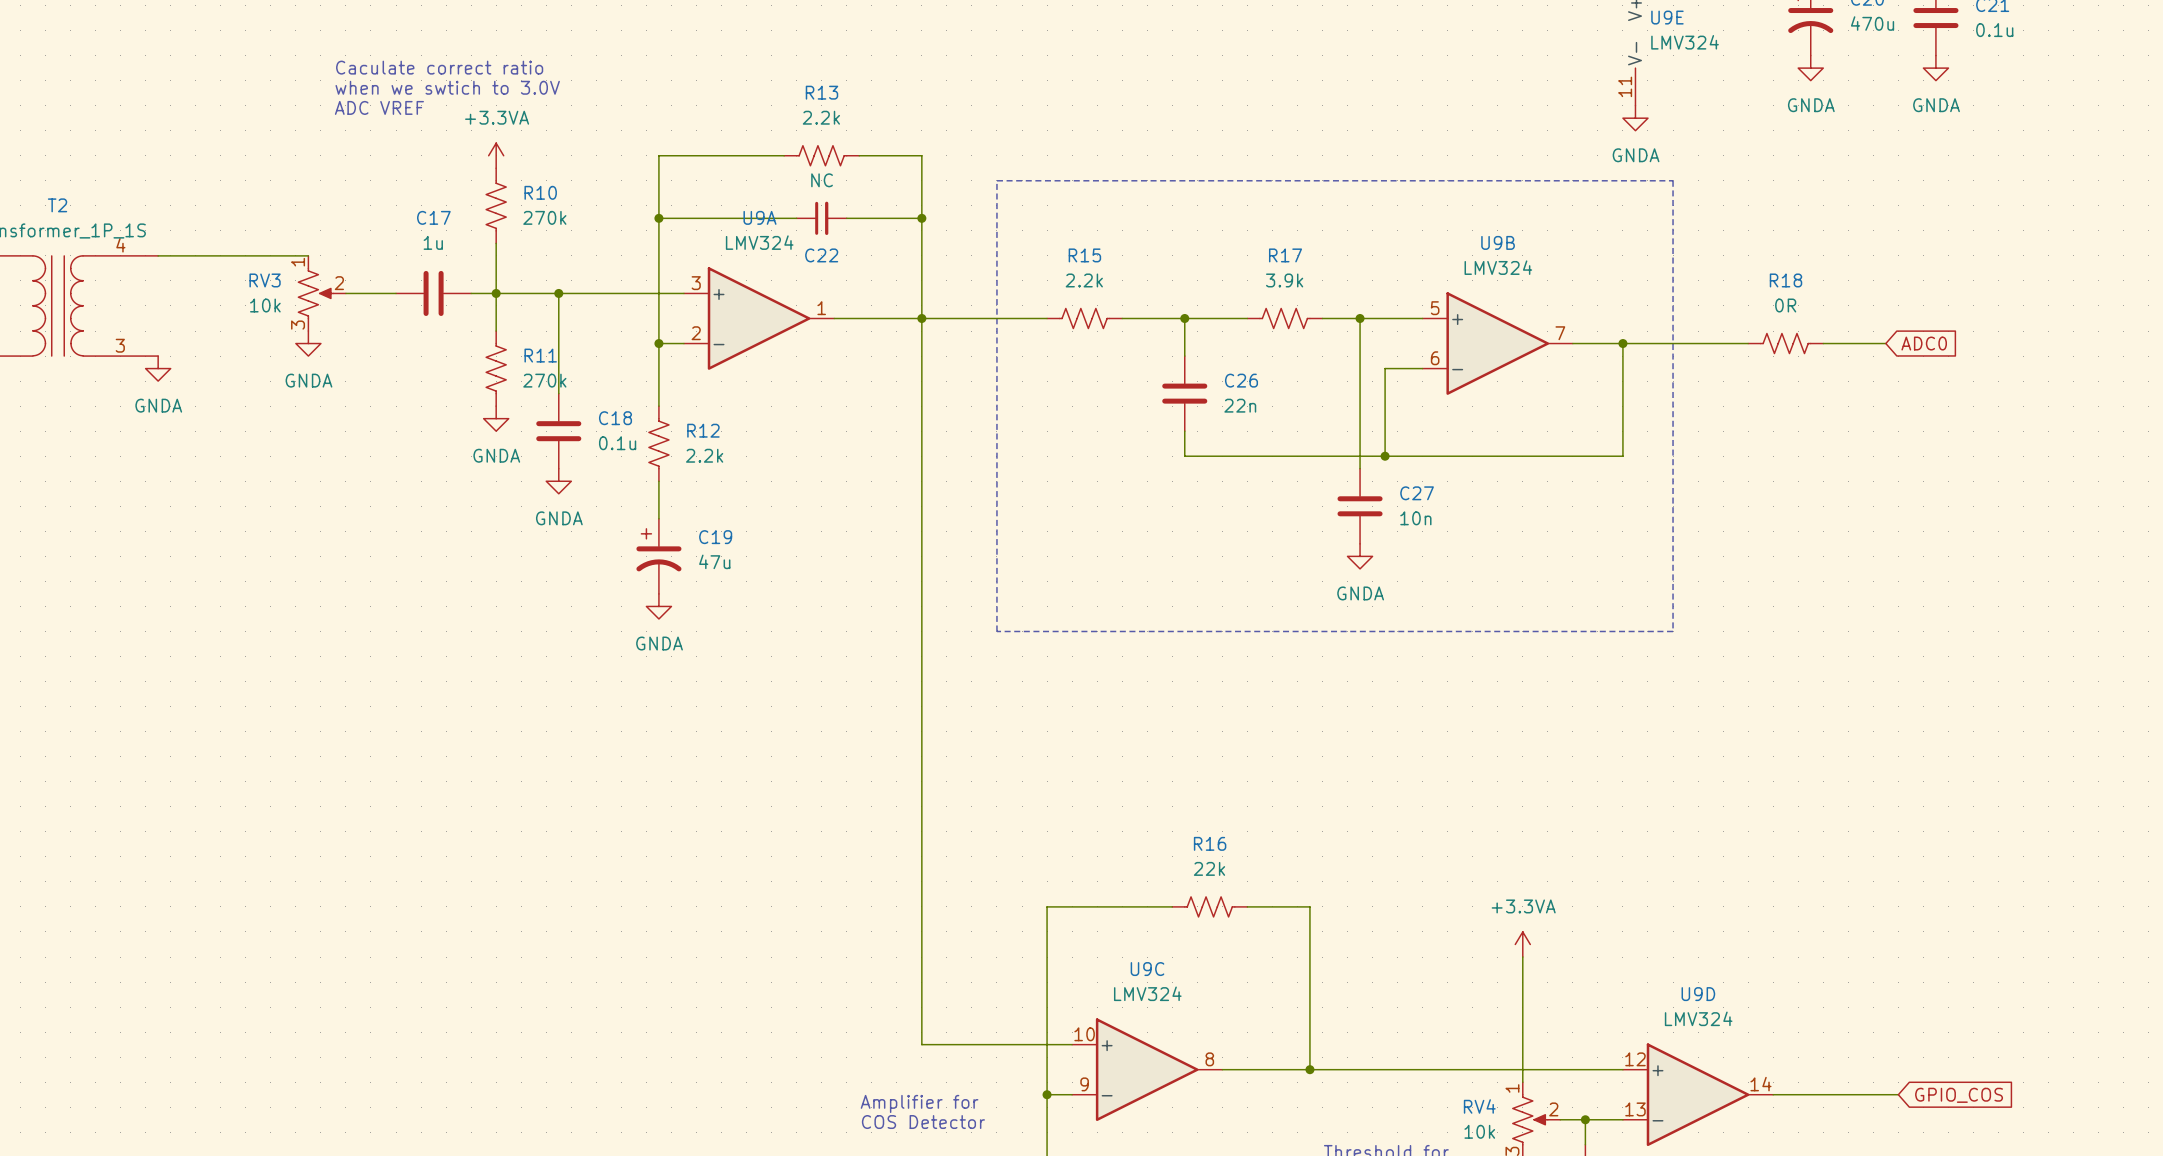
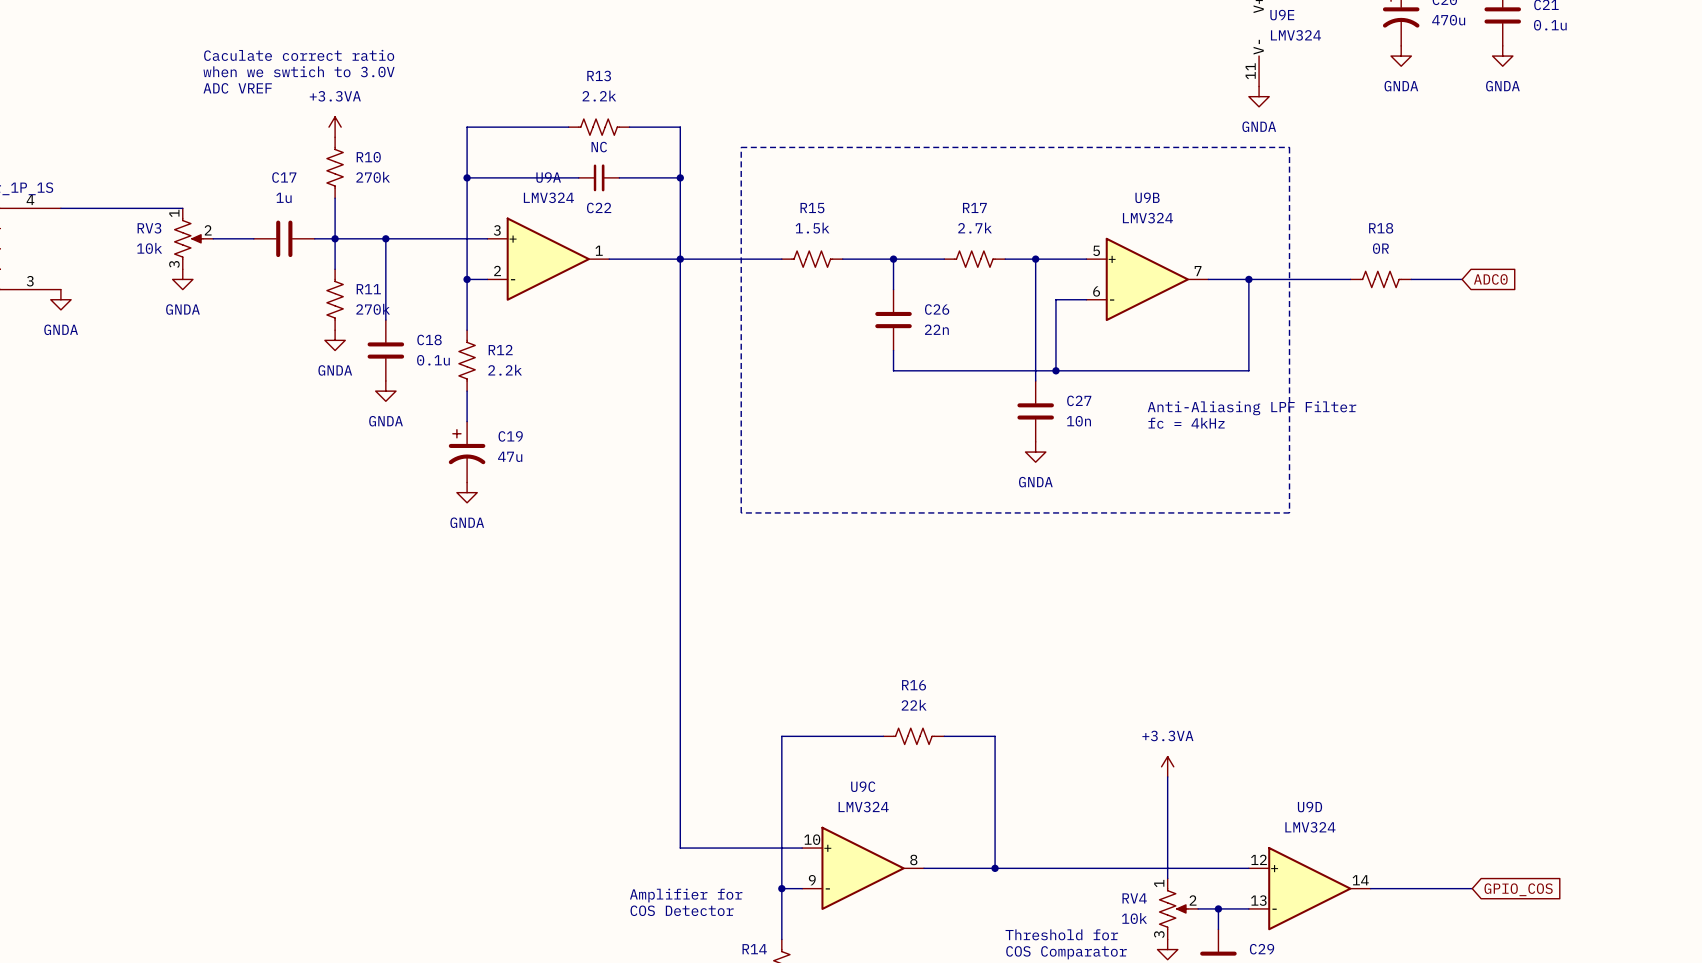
R15 value: 2.2k (1084, 280) -> 1.5k (812, 228)
R17 value: 3.9k (1284, 280) -> 2.7k (975, 228)
text: none -> Anti-Aliasing LPF Filter (1252, 408)
text: none -> fc = 4kHz (1186, 423)

